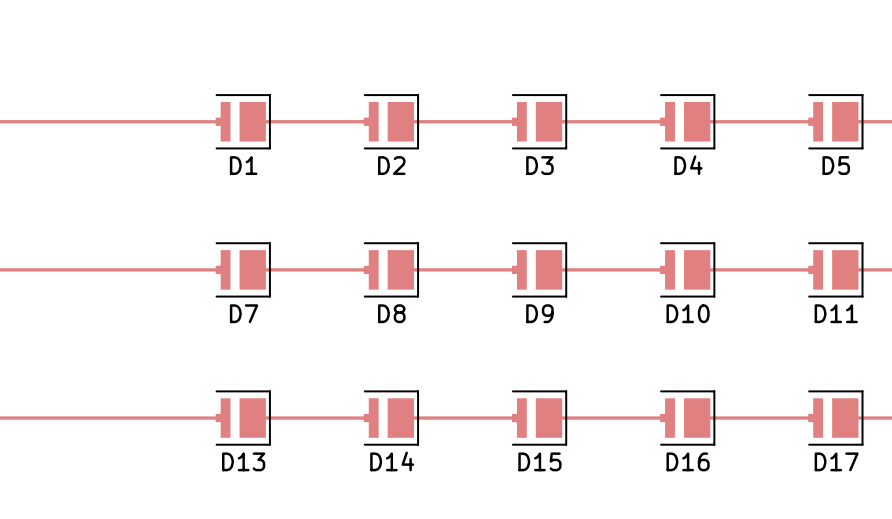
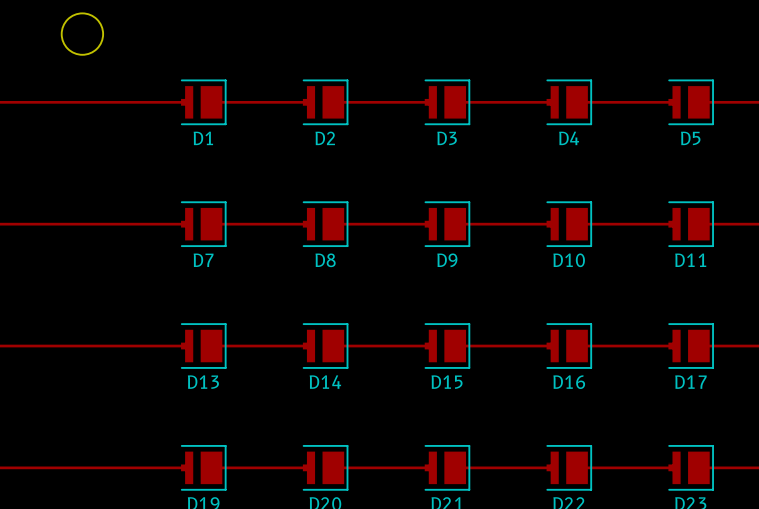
round board edge: none -> [61, 13, 104, 56]

